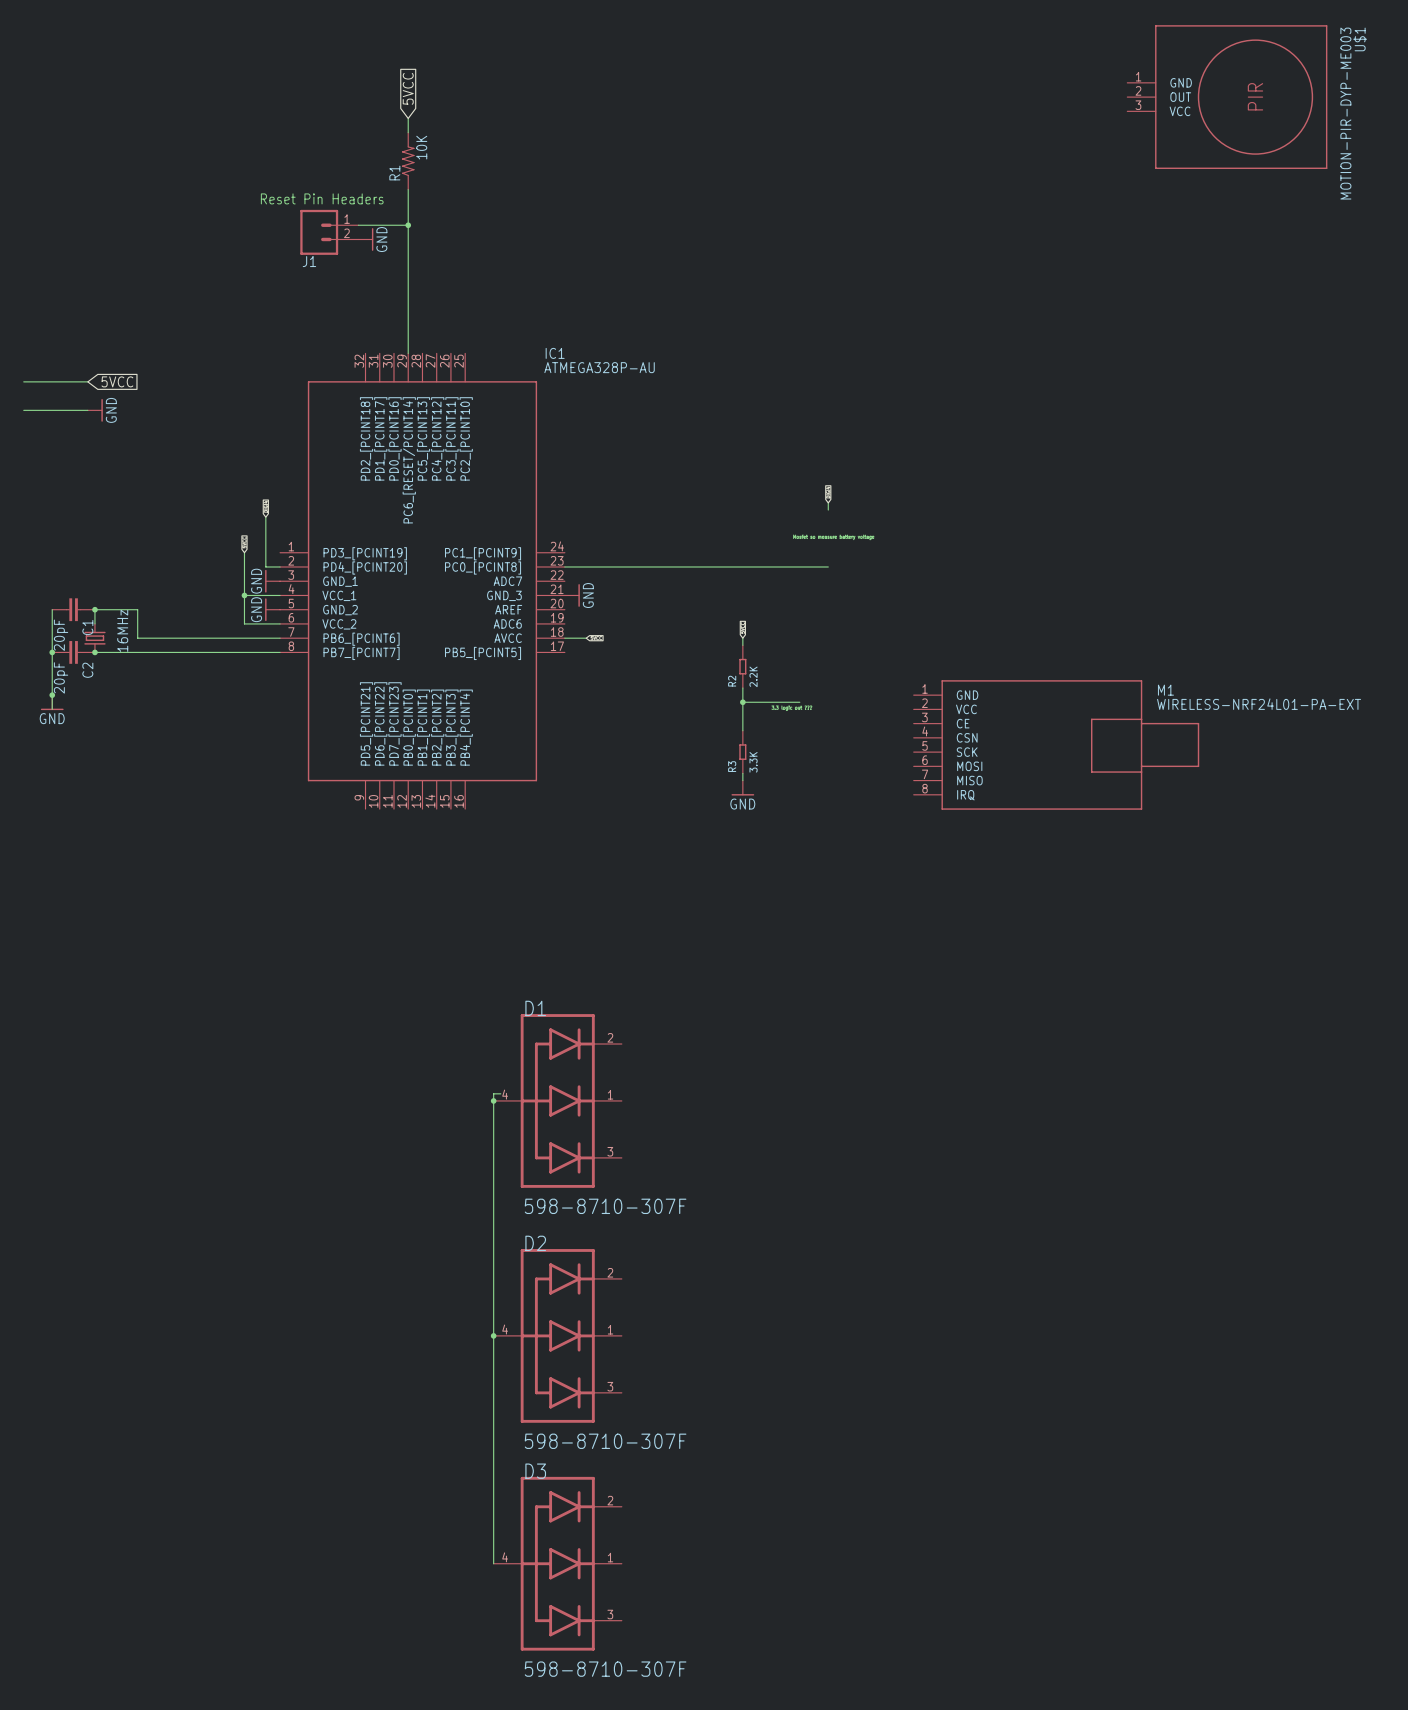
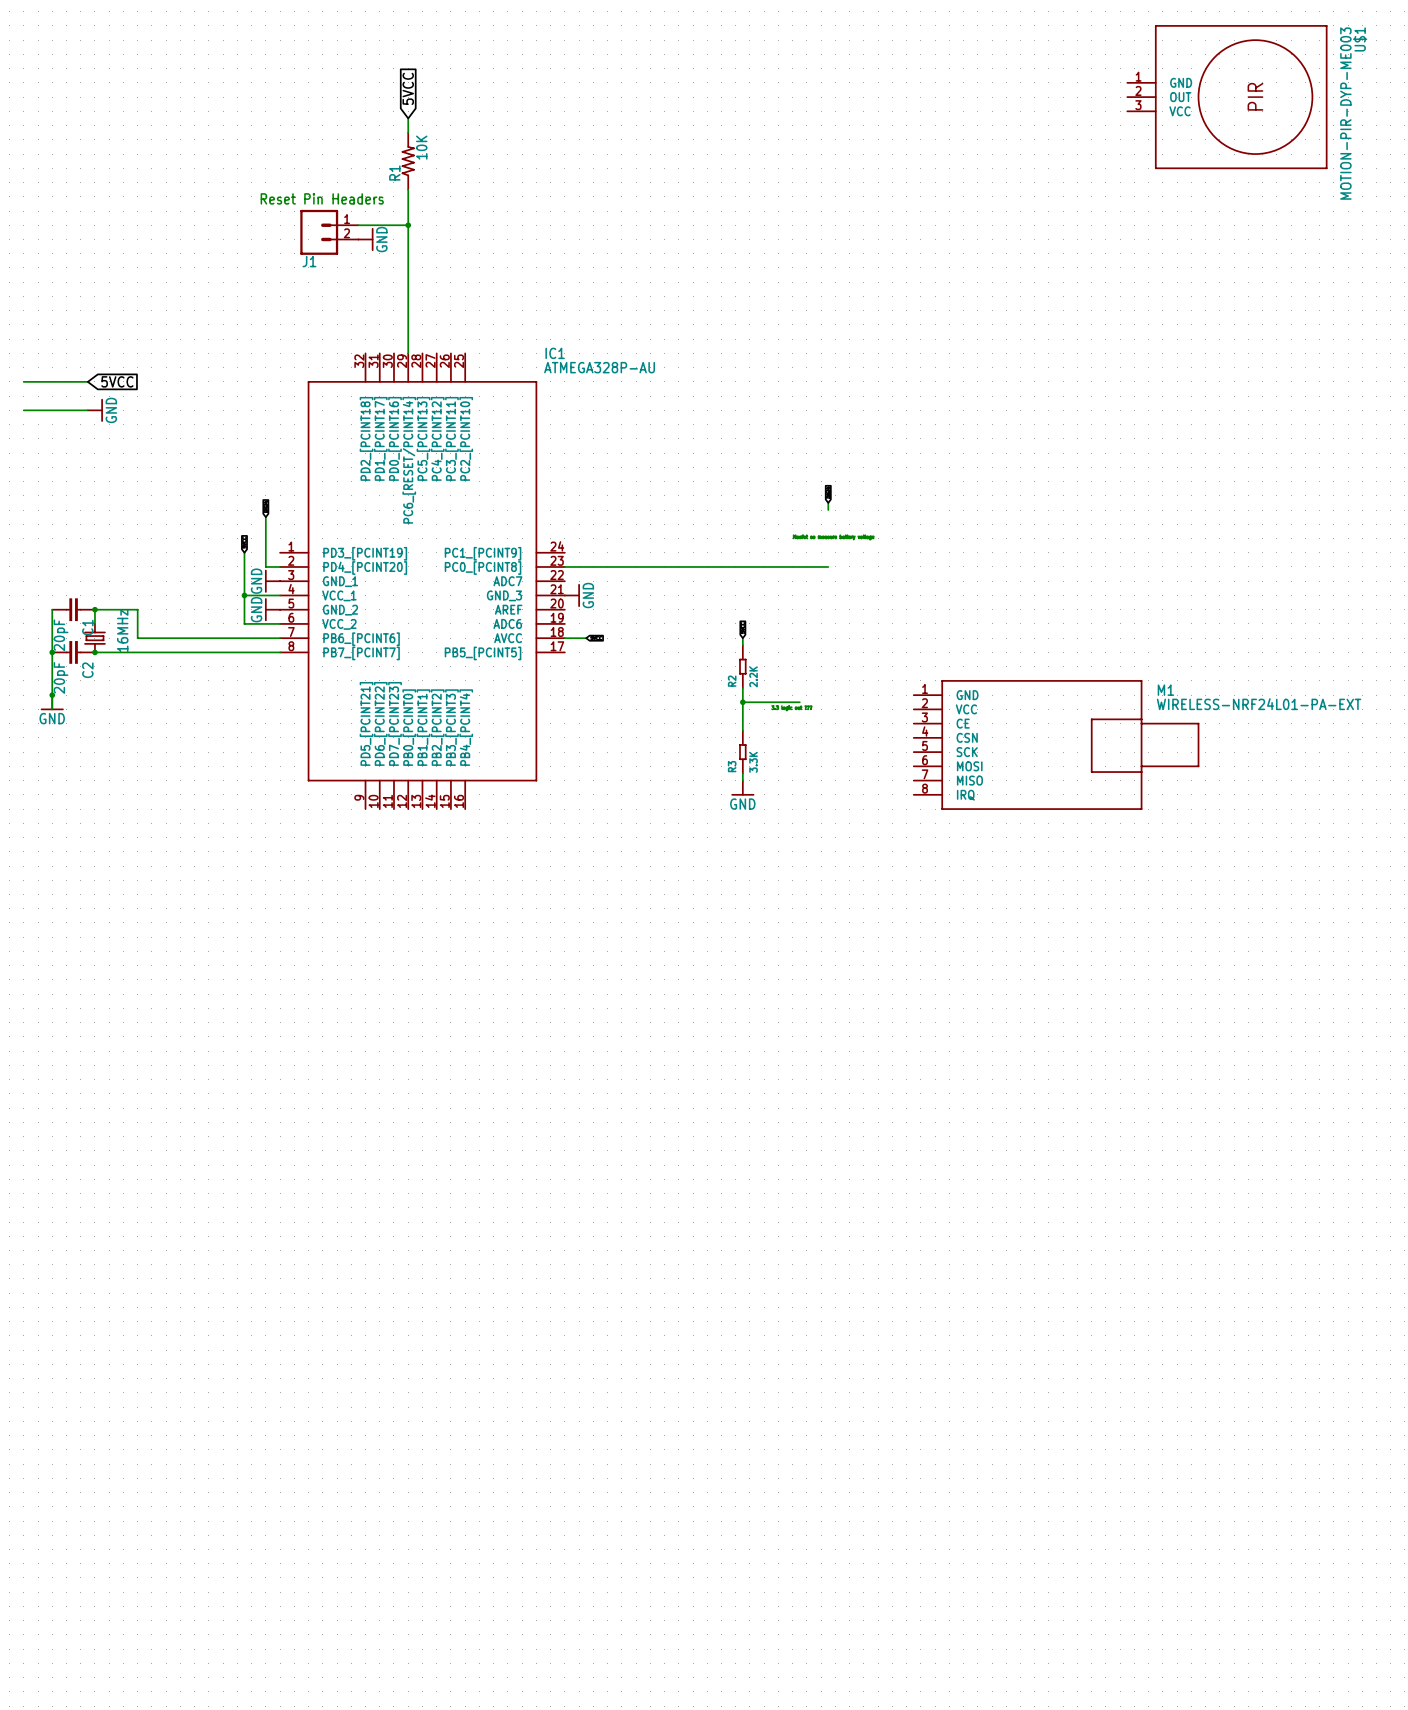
wire: (500, 1093) (493, 1093) (493, 1563) -> none
junction: (493, 1100) -> none
D1: (557, 1100) -> none
junction: (493, 1335) -> none
D2: (557, 1335) -> none
D3: (557, 1563) -> none

